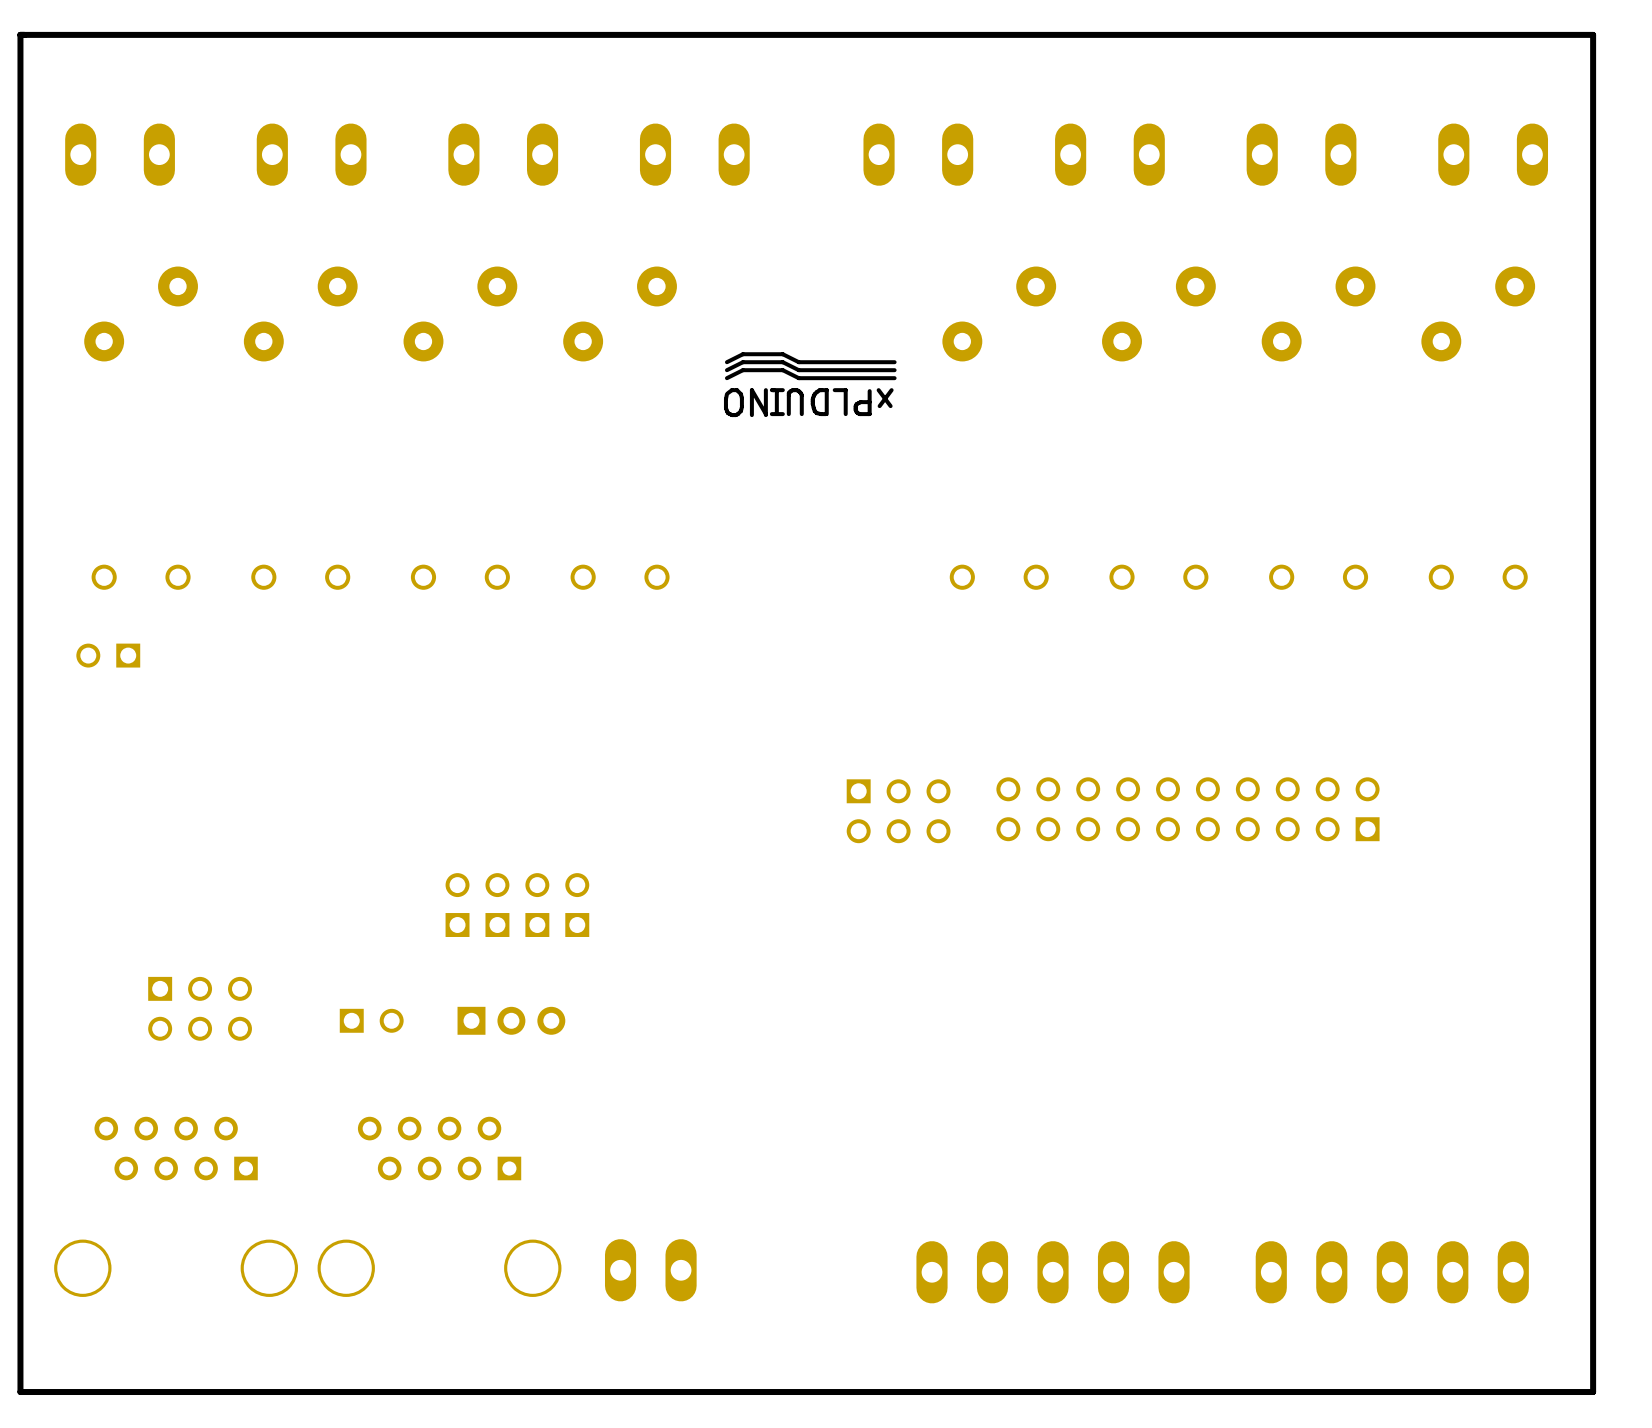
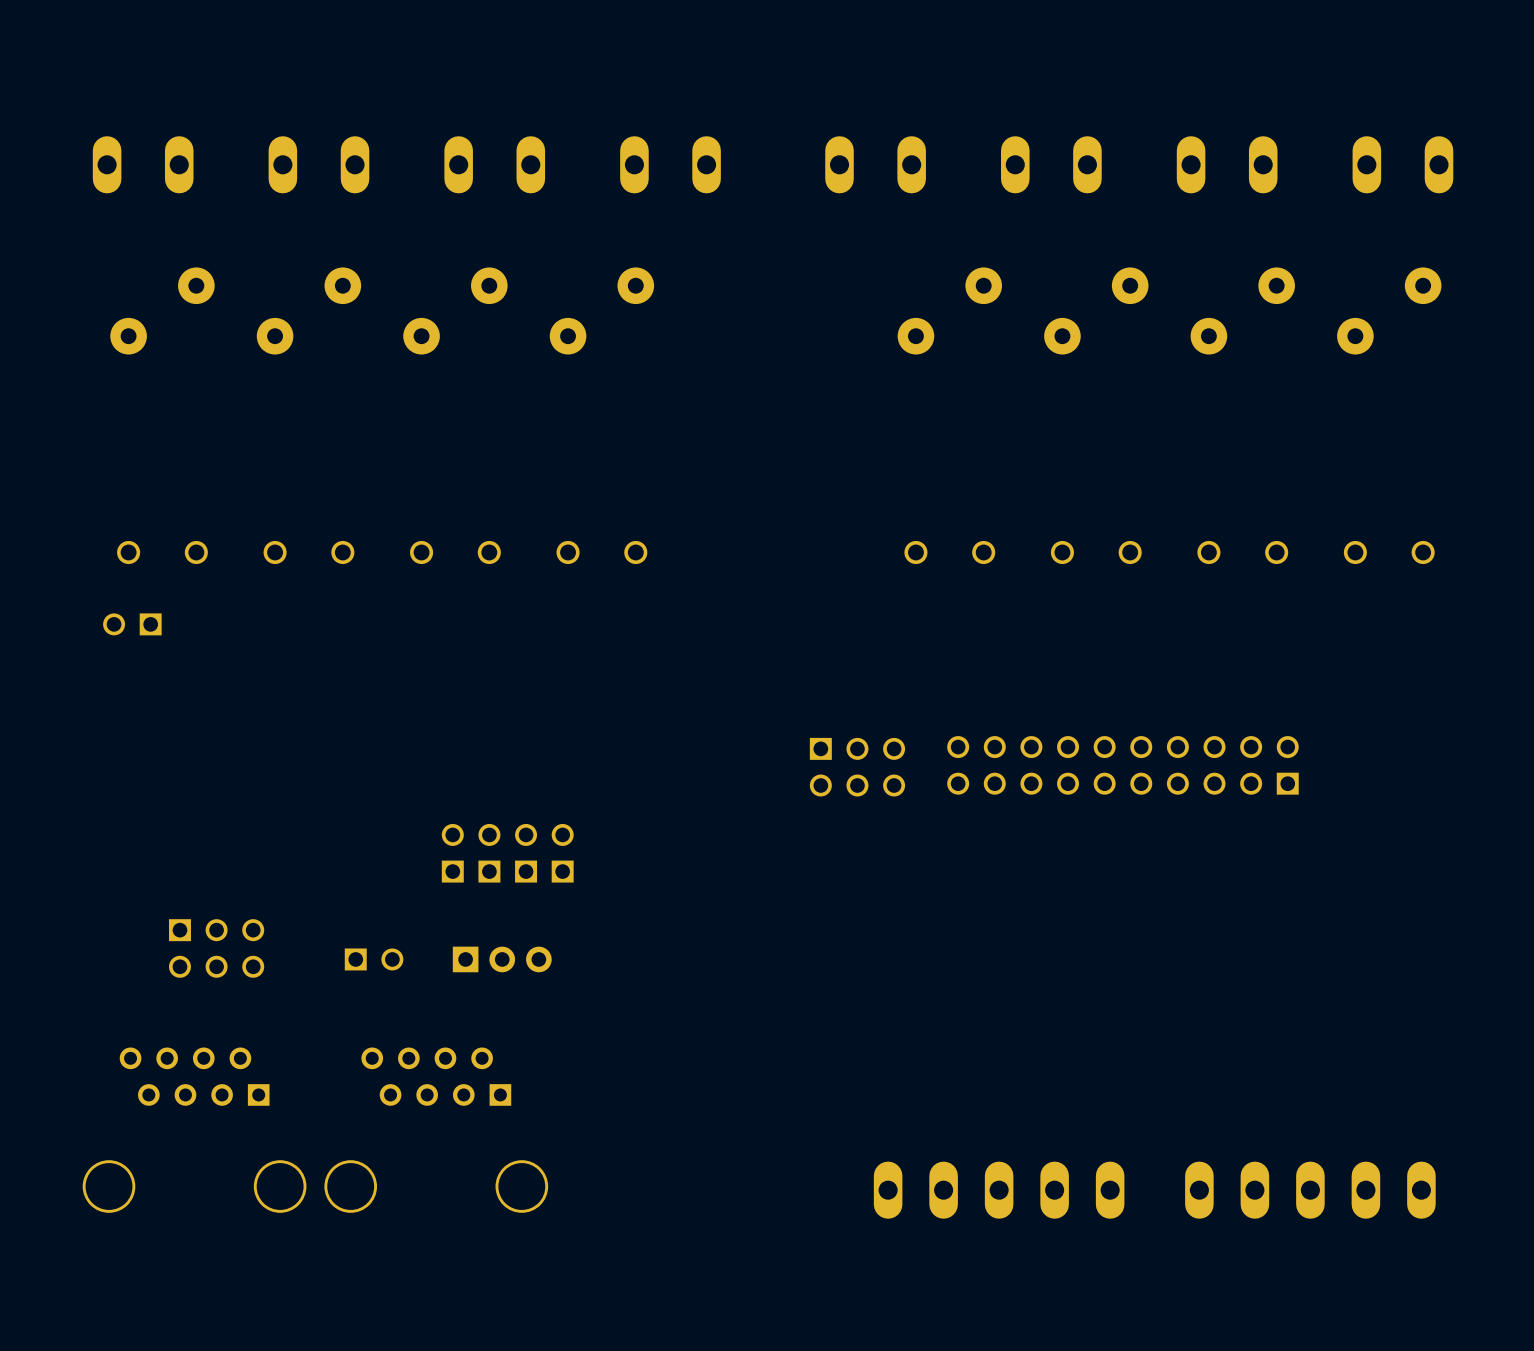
board edge: (1593, 34) (20, 34) (20, 1392) (1593, 1392) (1593, 34) -> none
drawing: [723, 352, 897, 418] -> none
part: (650, 1270) -> none

